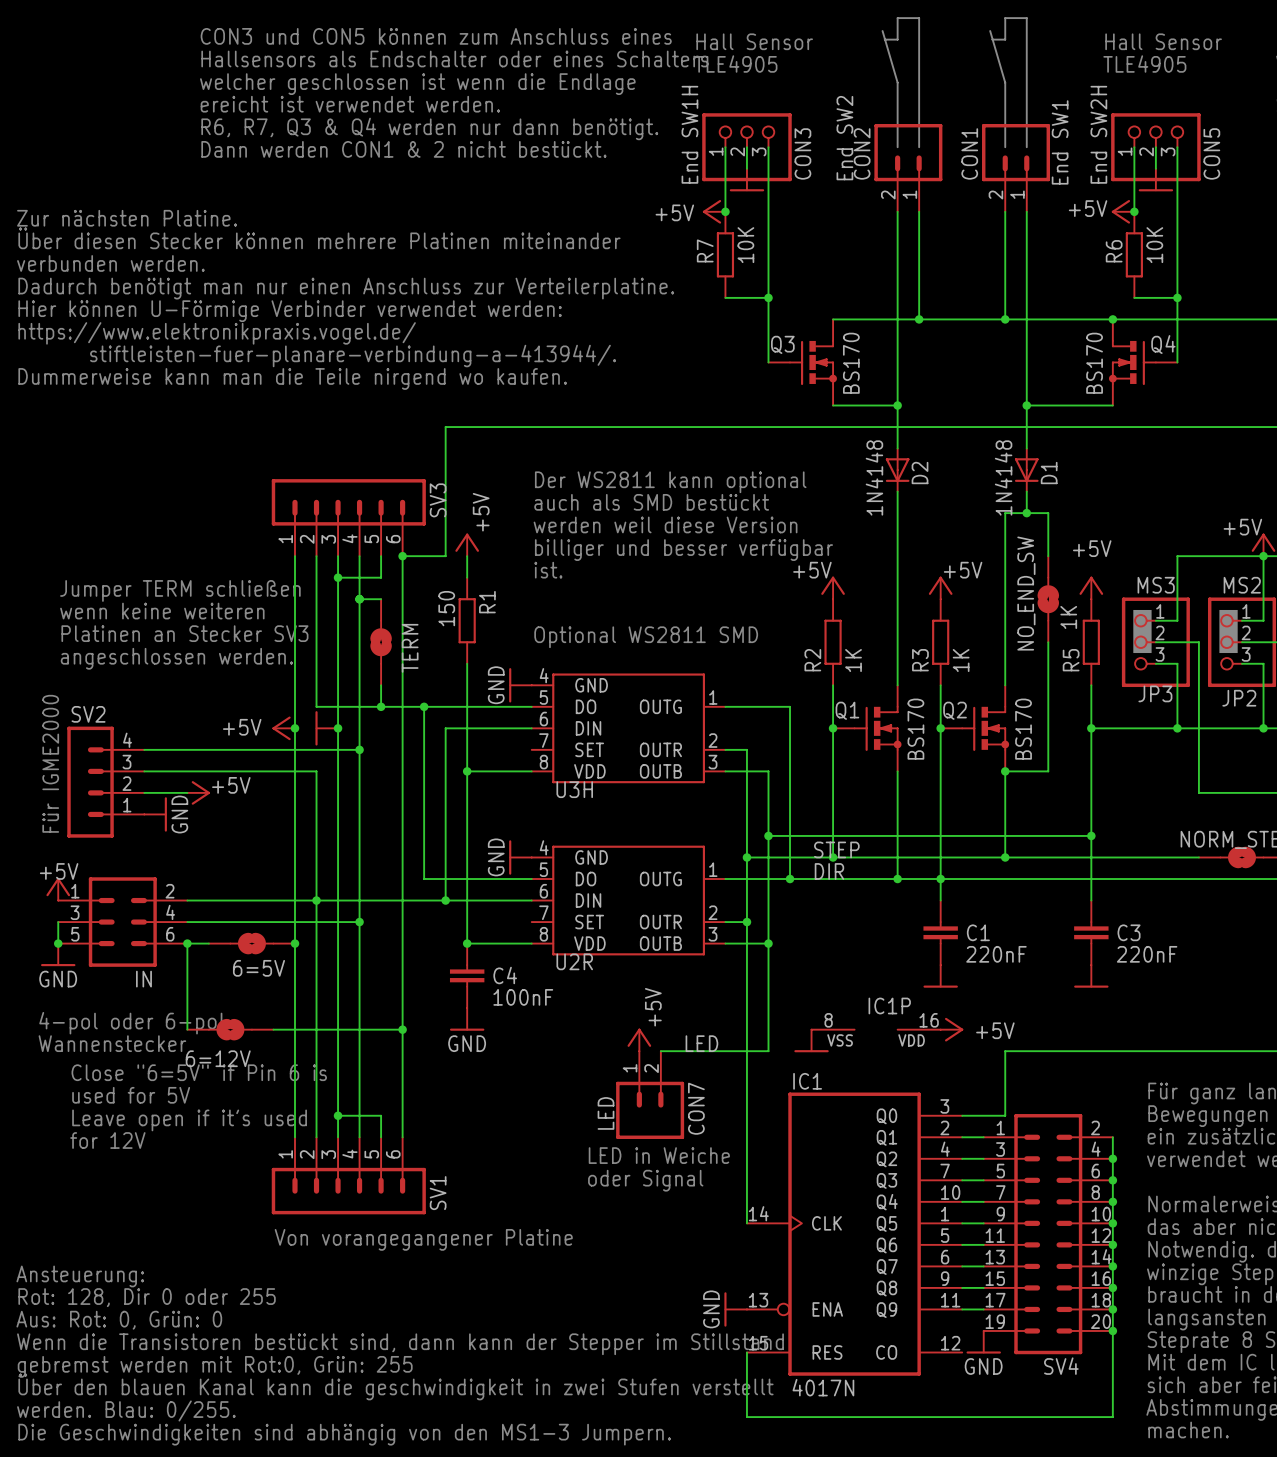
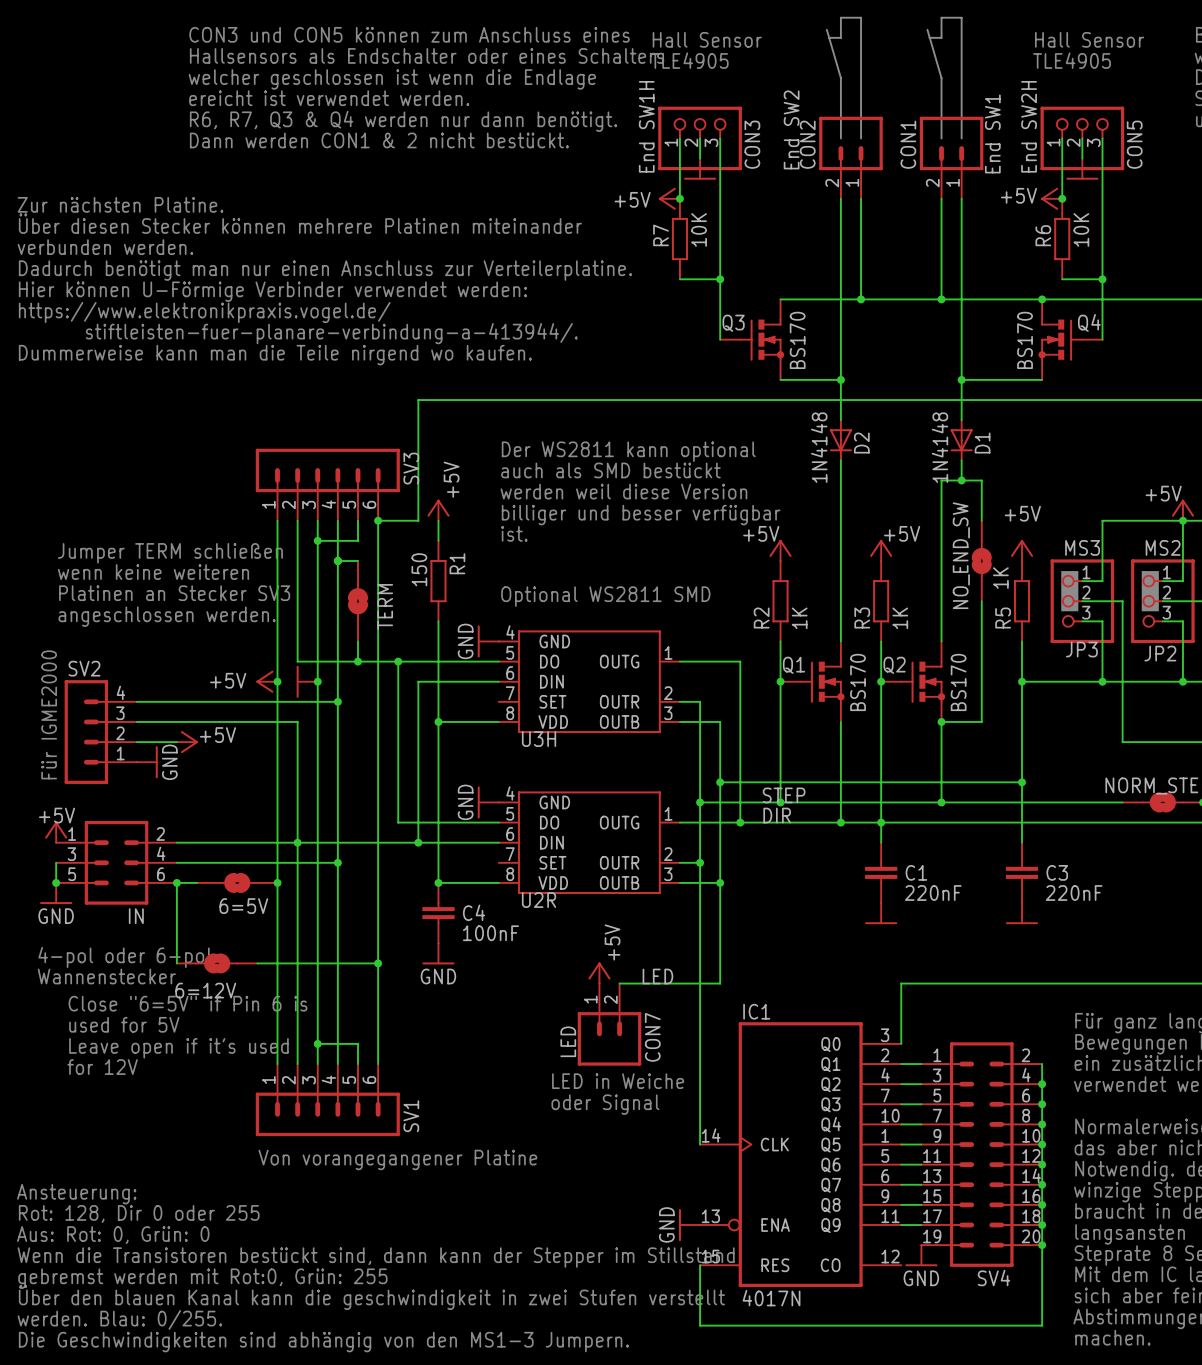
IC1P: (876, 1029) -> none
power symbol: +5V (951, 1029) -> none
power symbol: (811, 1040) -> none
wire: (1005, 1051) (1005, 1115) (962, 1115) -> (941, 983) (901, 983) (901, 1043)

